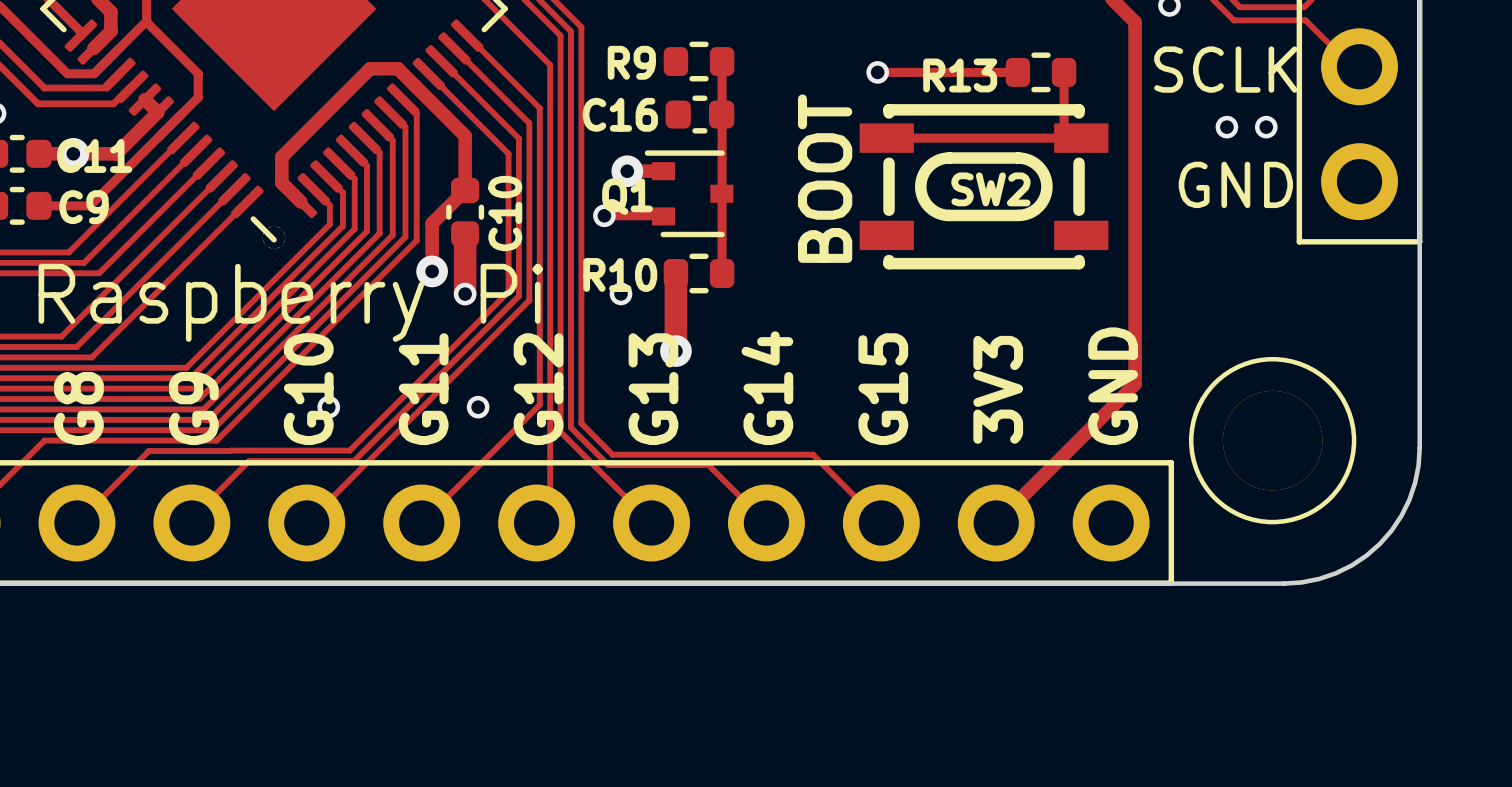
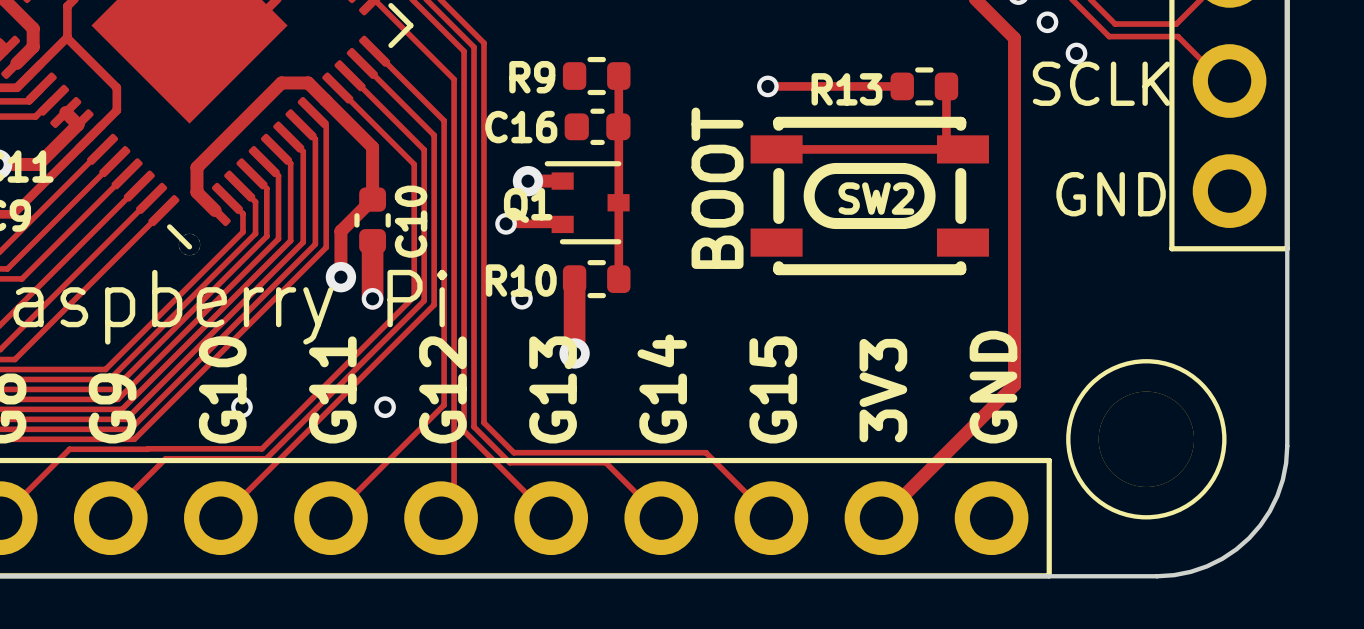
via: none -> (1076, 53)
via: (1226, 127) -> none
via: (1266, 127) -> none

